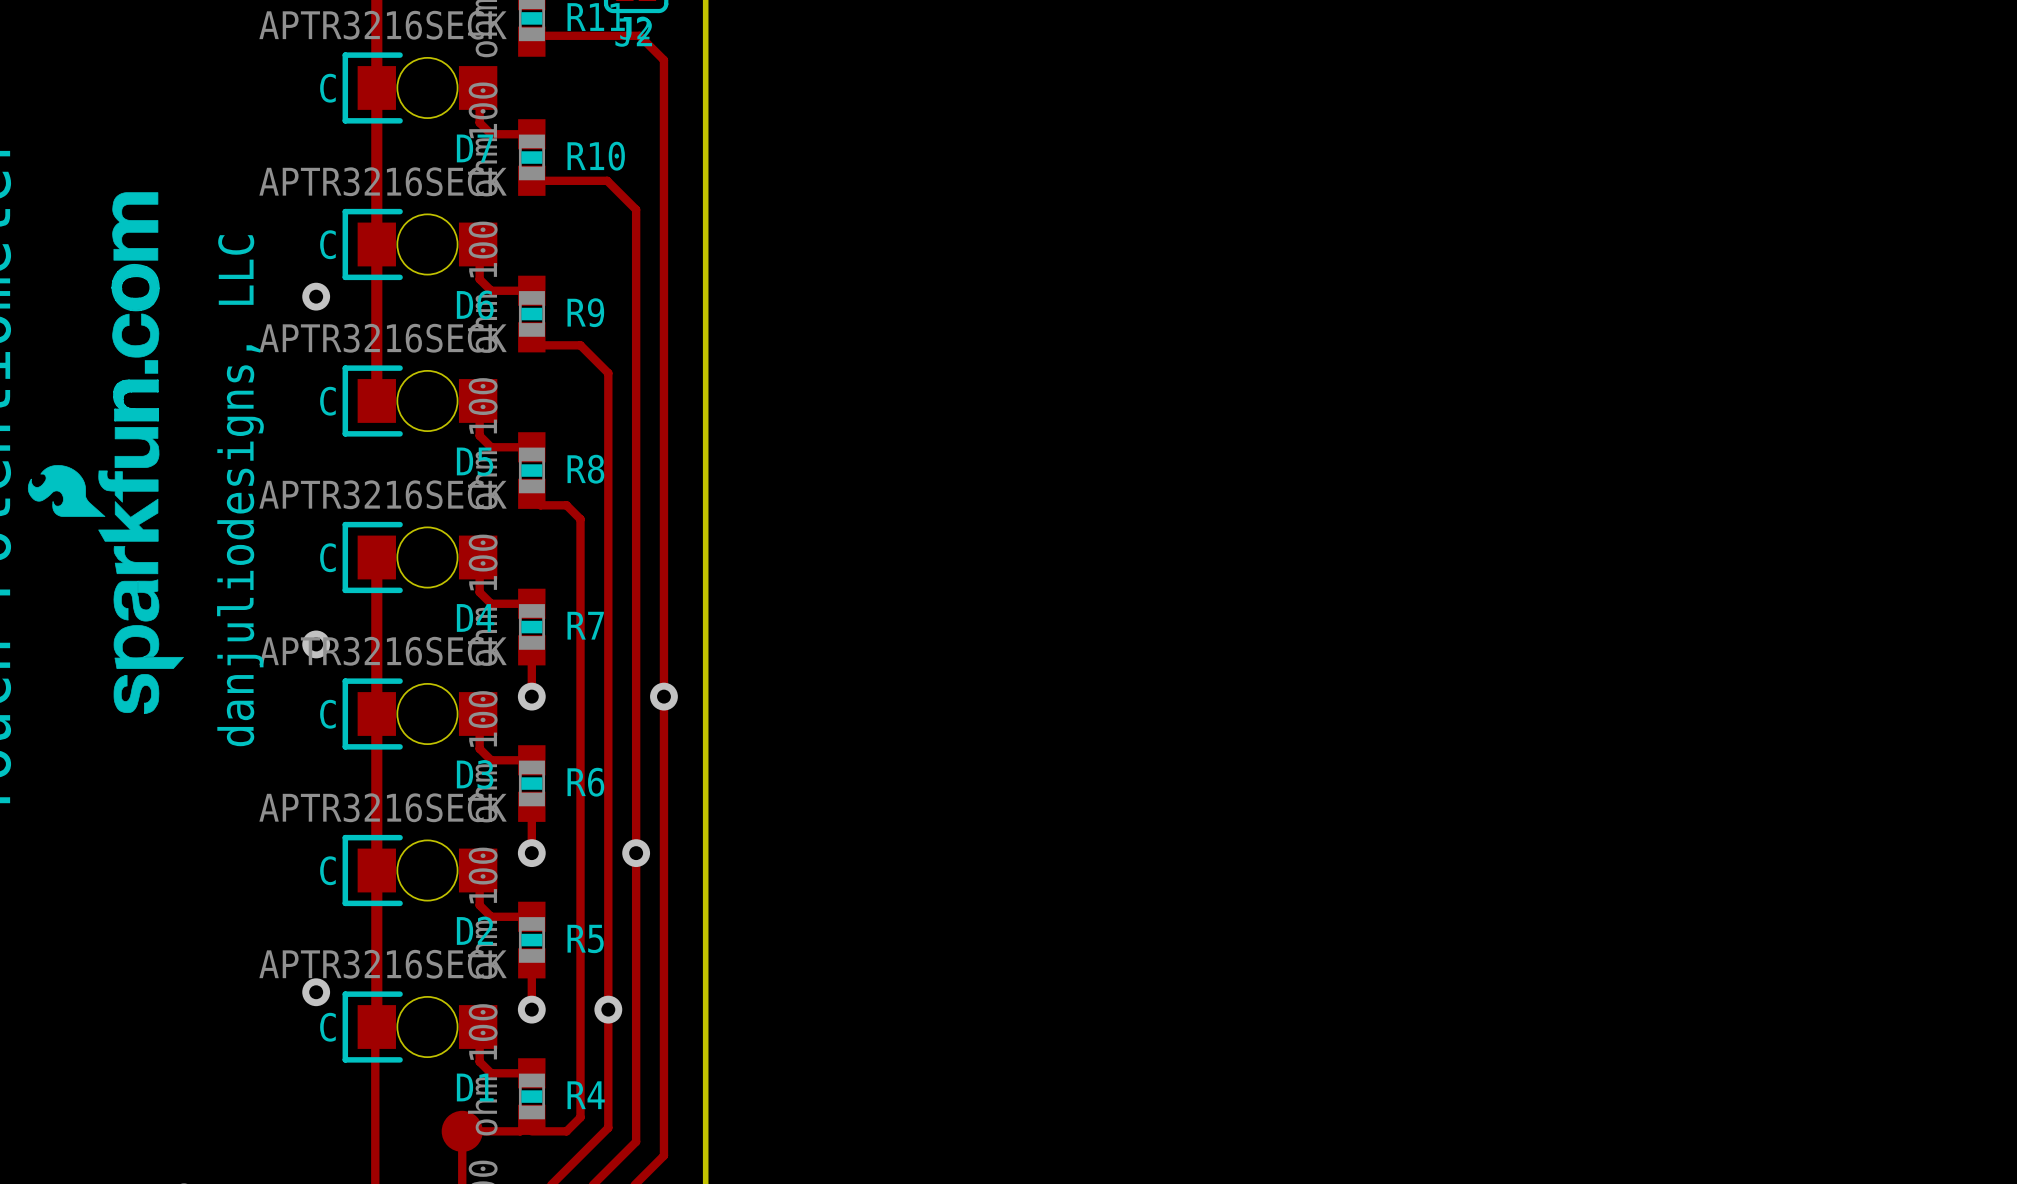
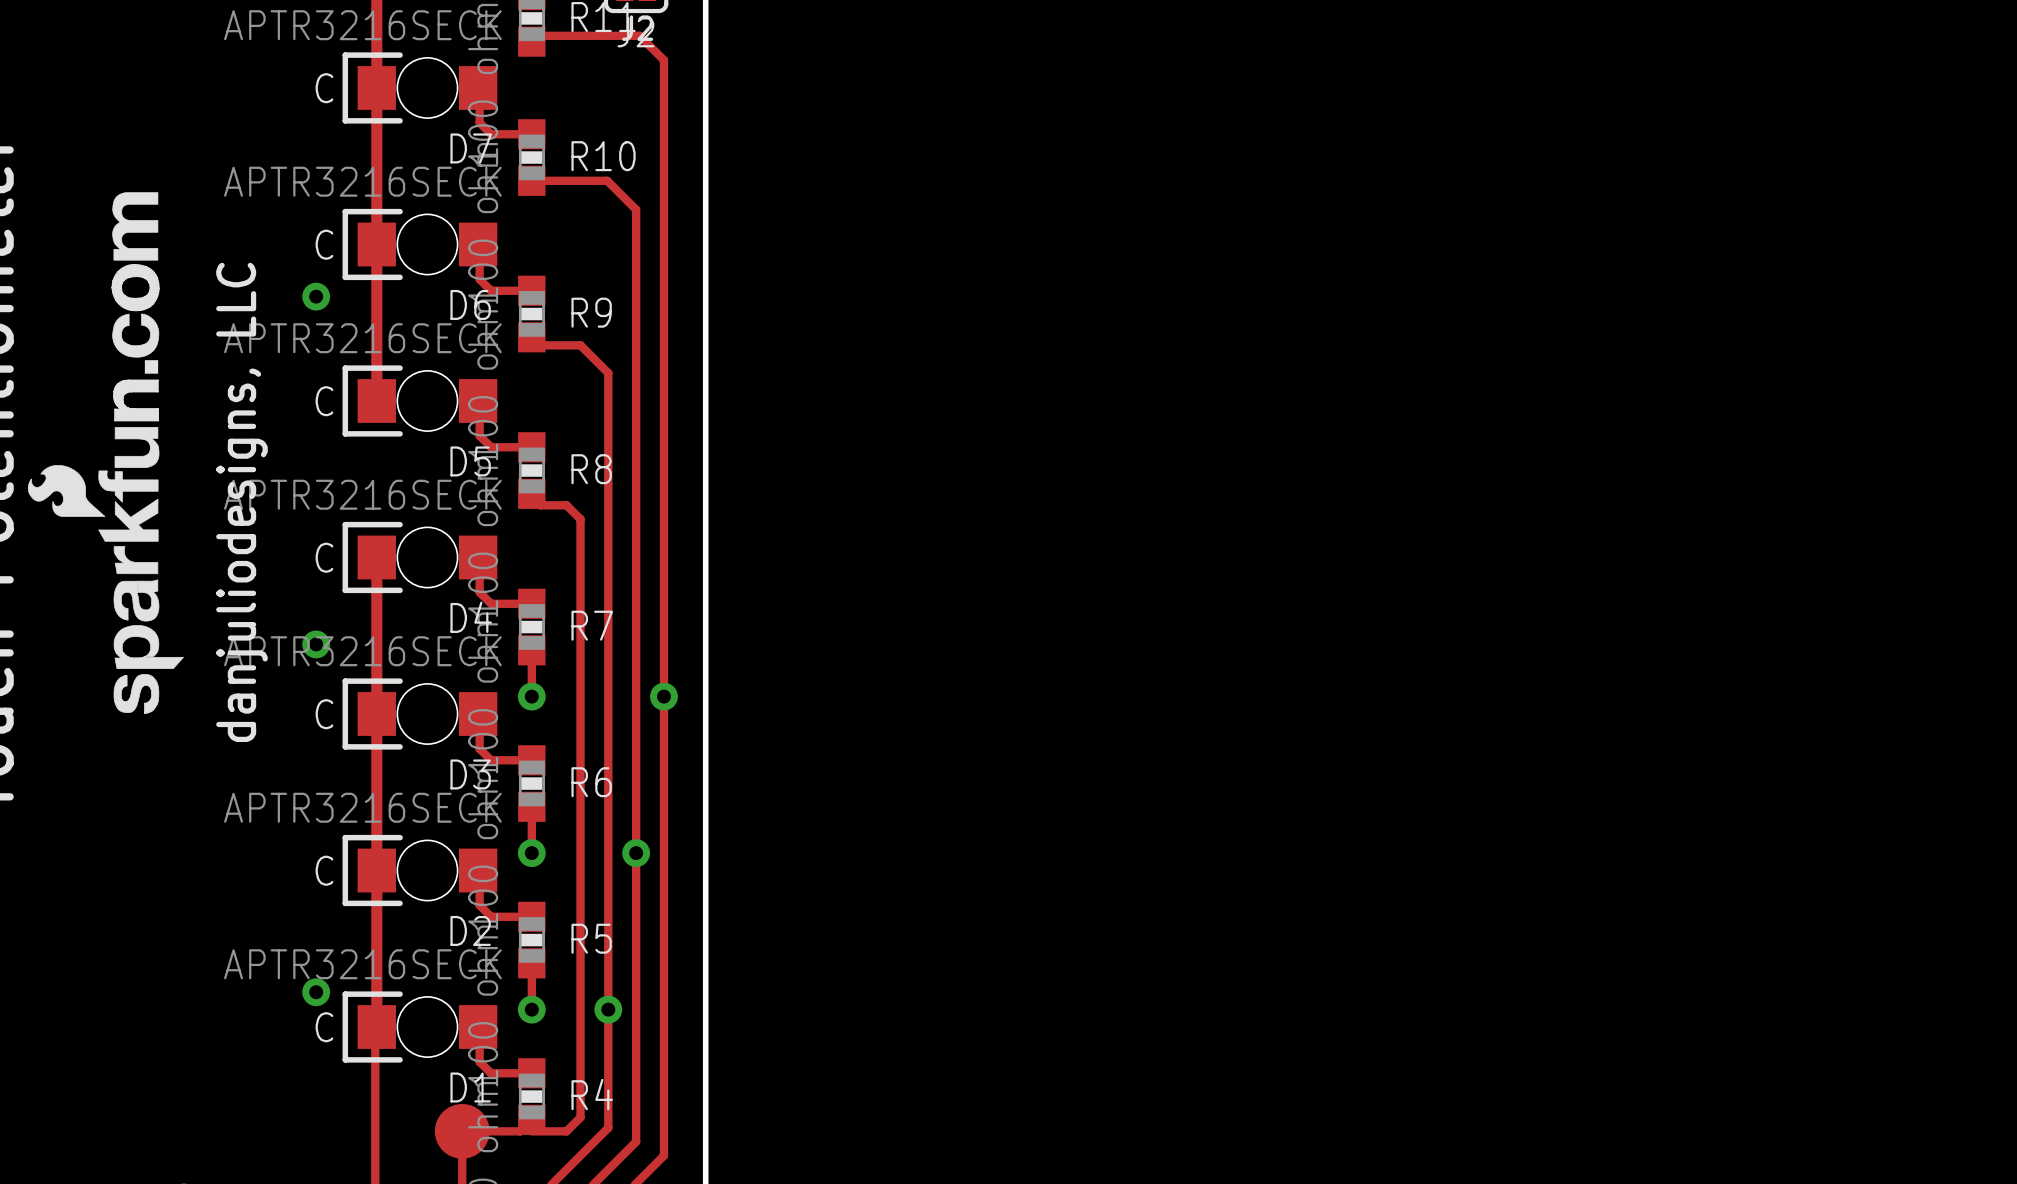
part footprint: [441, 1110, 483, 1152] -> [434, 1103, 490, 1159]

